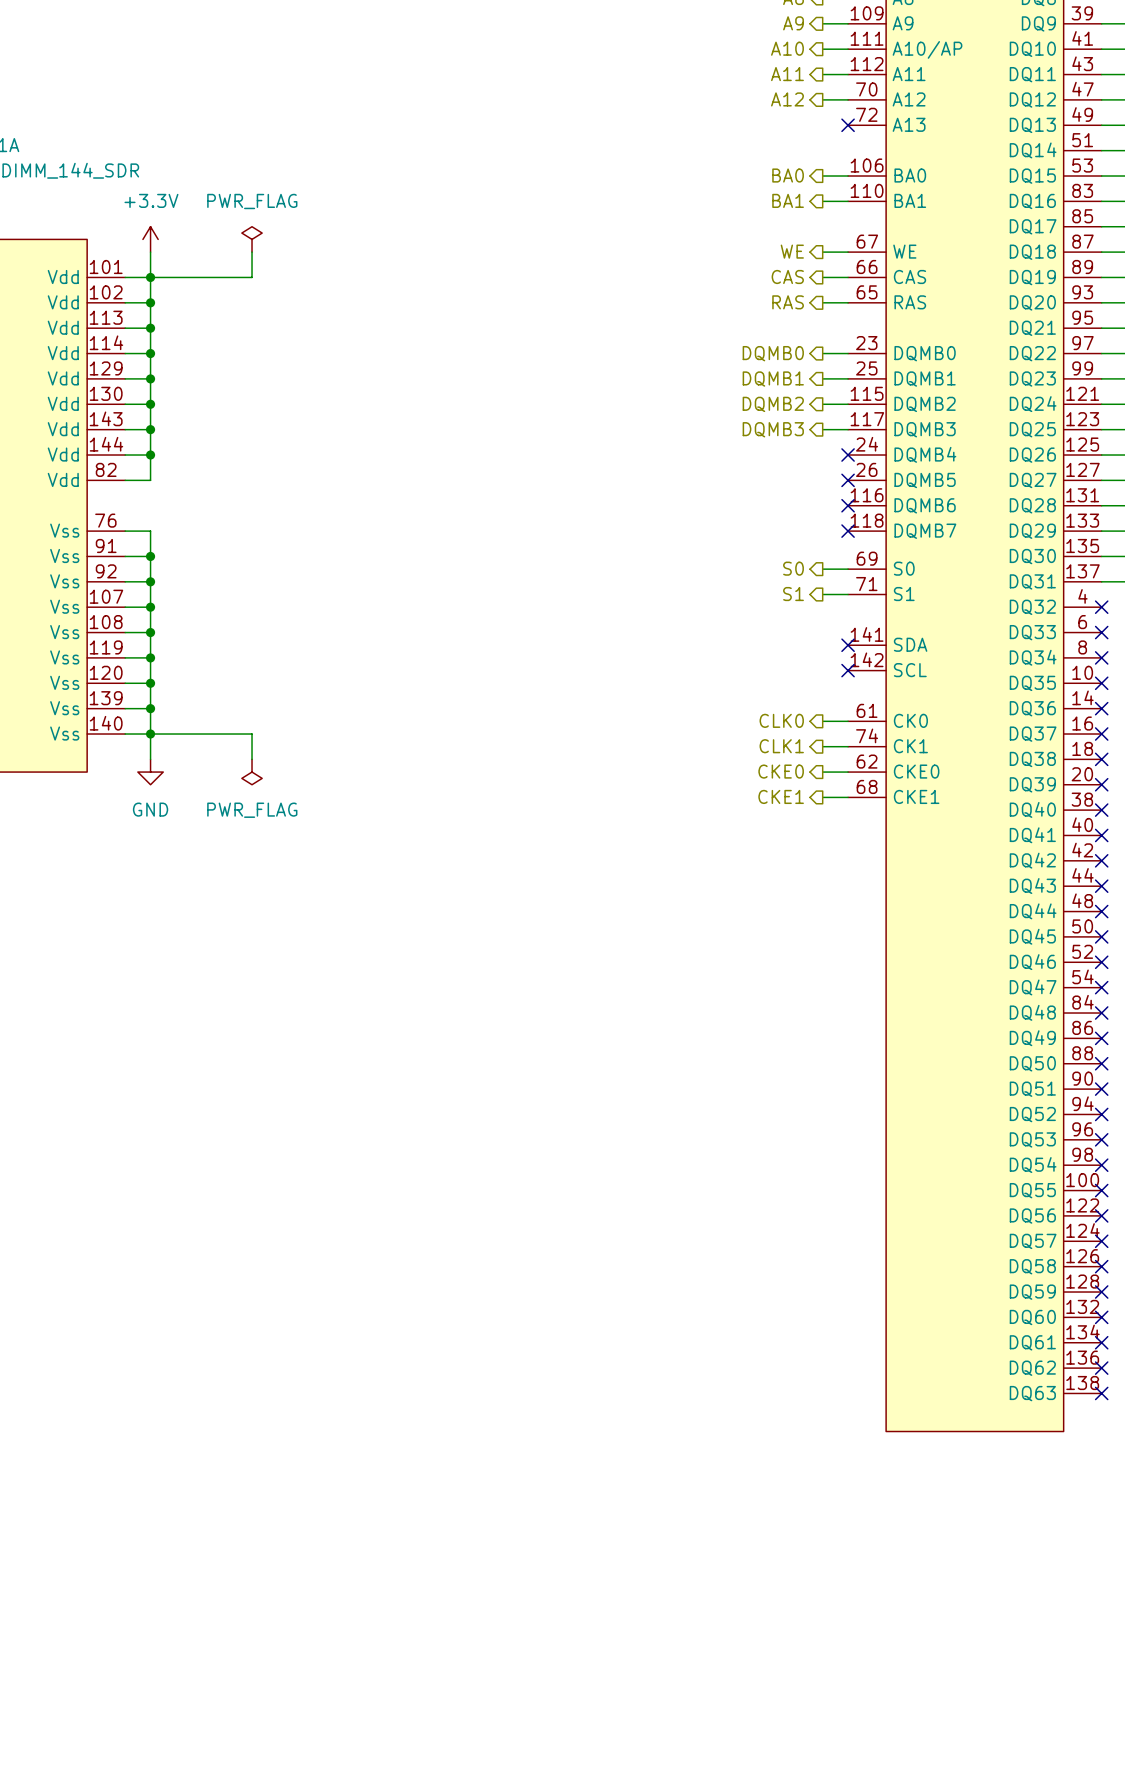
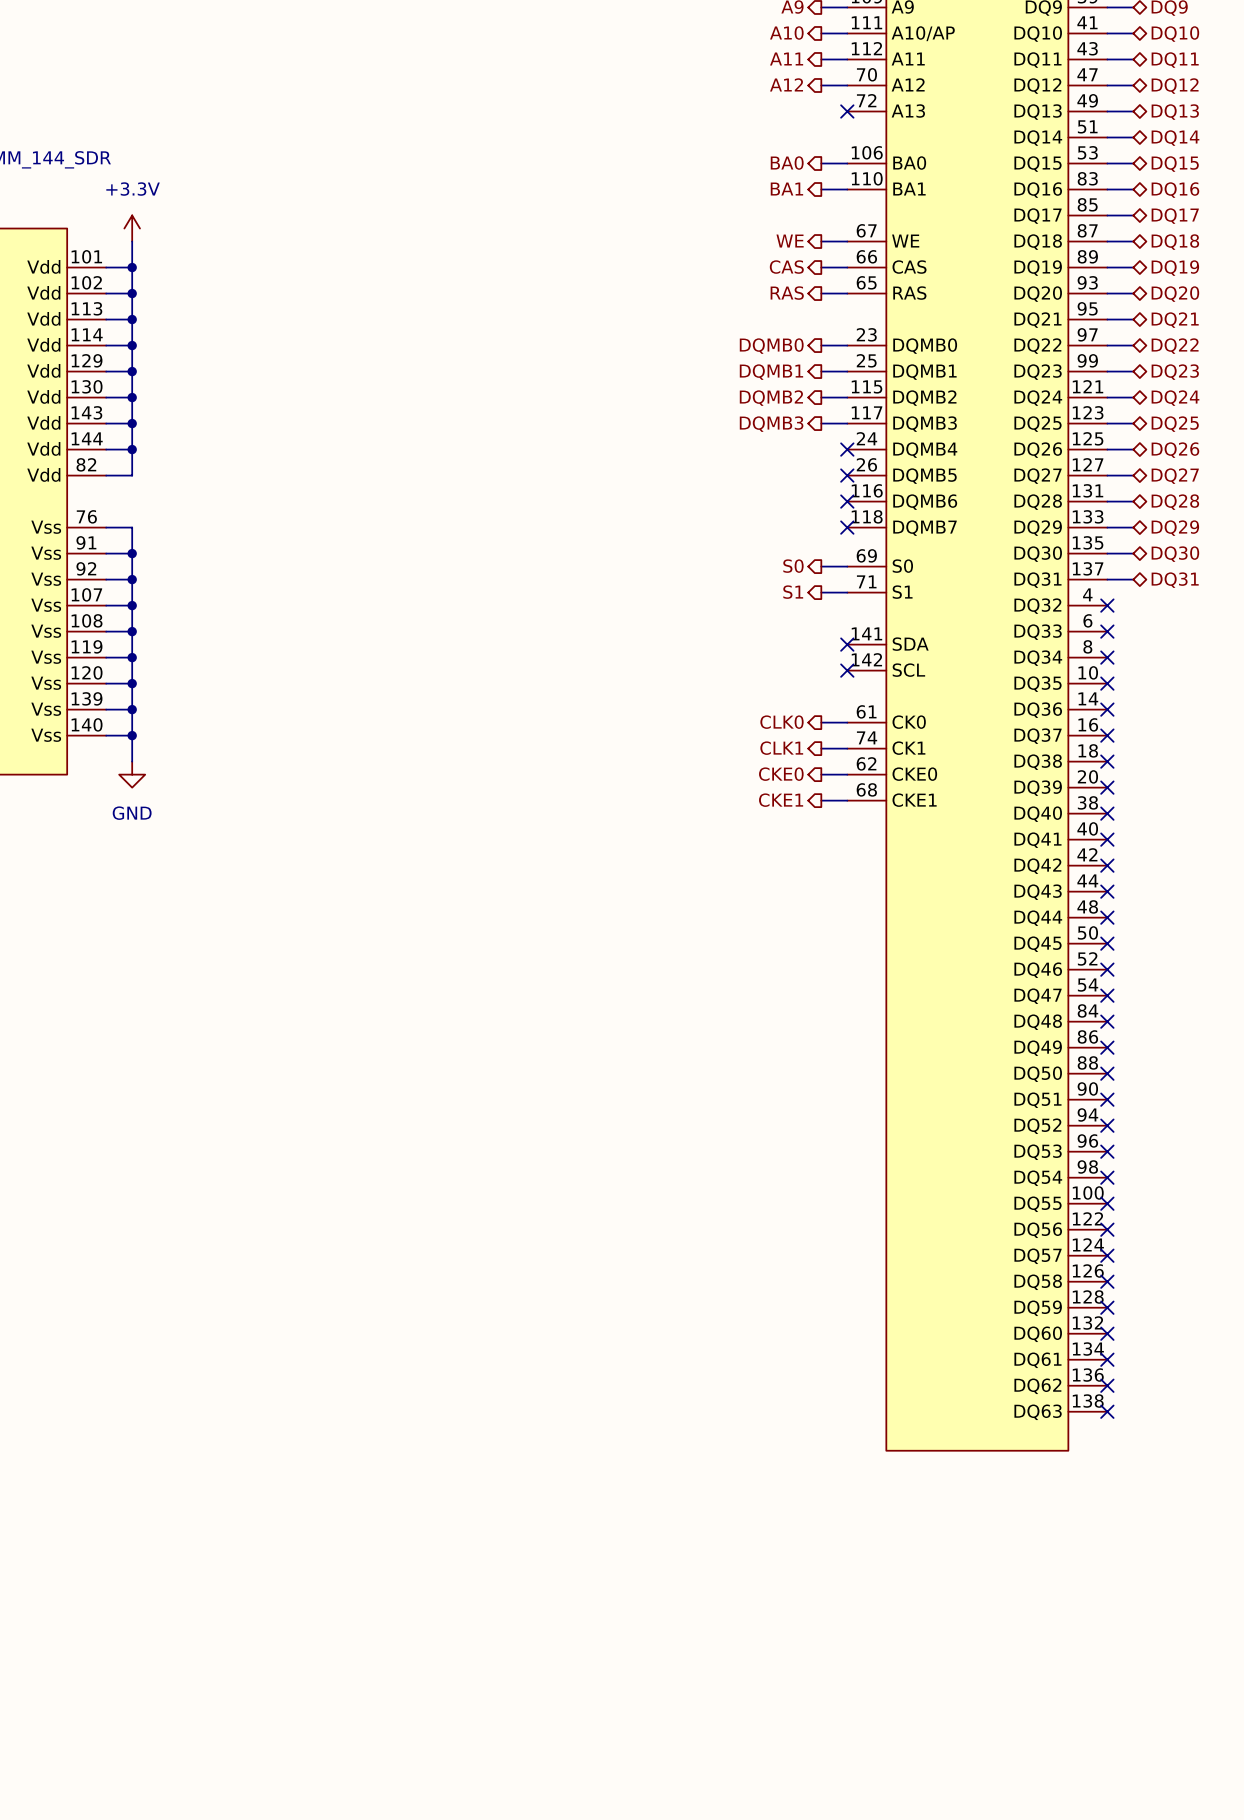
power symbol: PWR_FLAG (252, 239) -> none
wire: (252, 252) (252, 277) (150, 277) -> none
wire: (150, 734) (252, 734) (252, 759) -> none
power symbol: PWR_FLAG (252, 772) -> none

